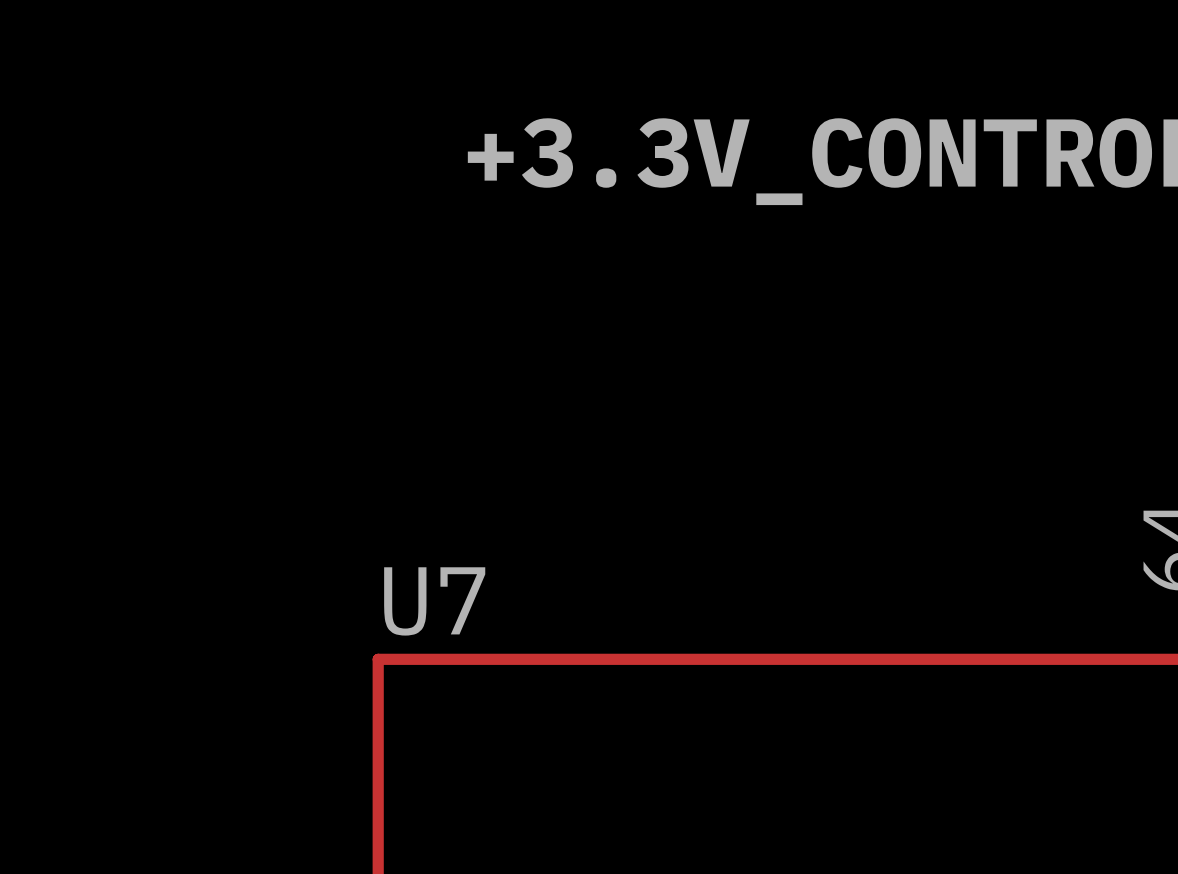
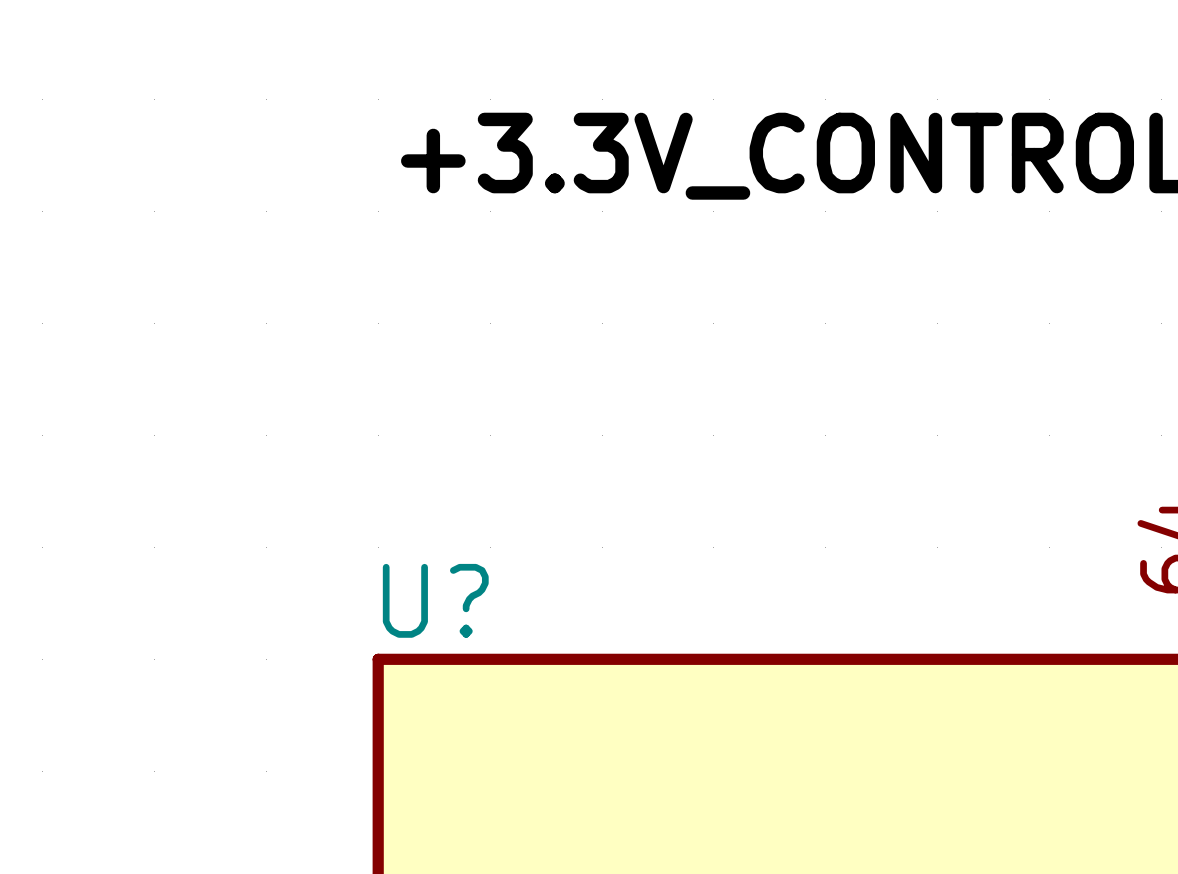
U7 name: U7 (434, 601) -> U? (435, 600)

